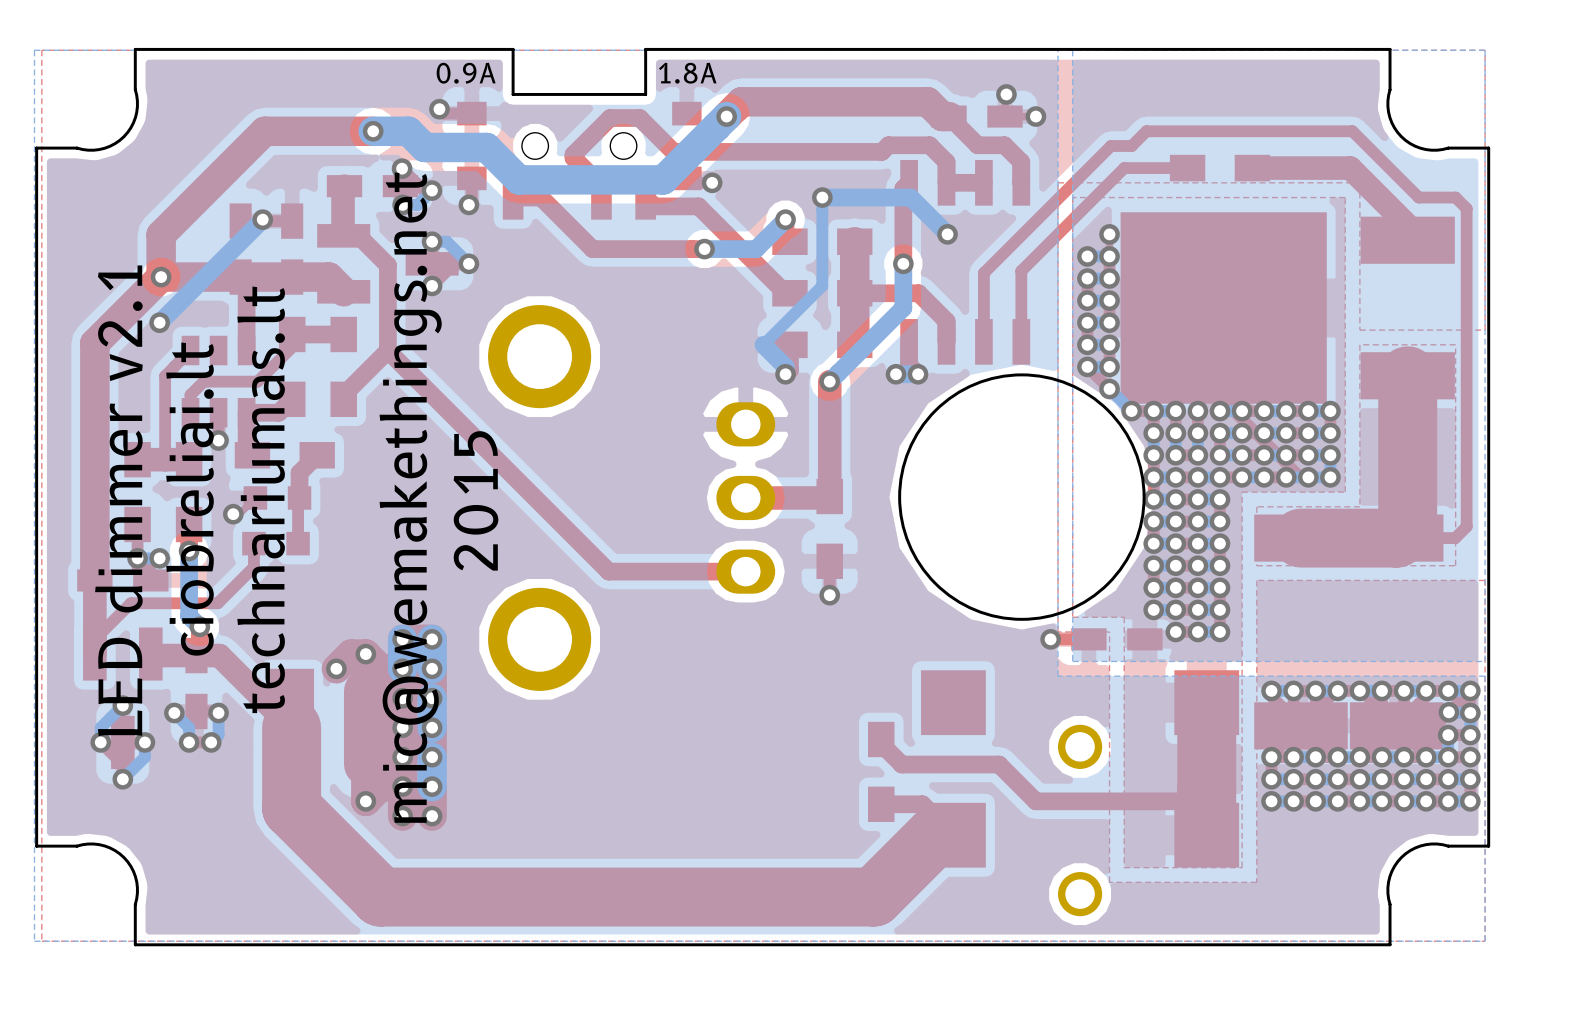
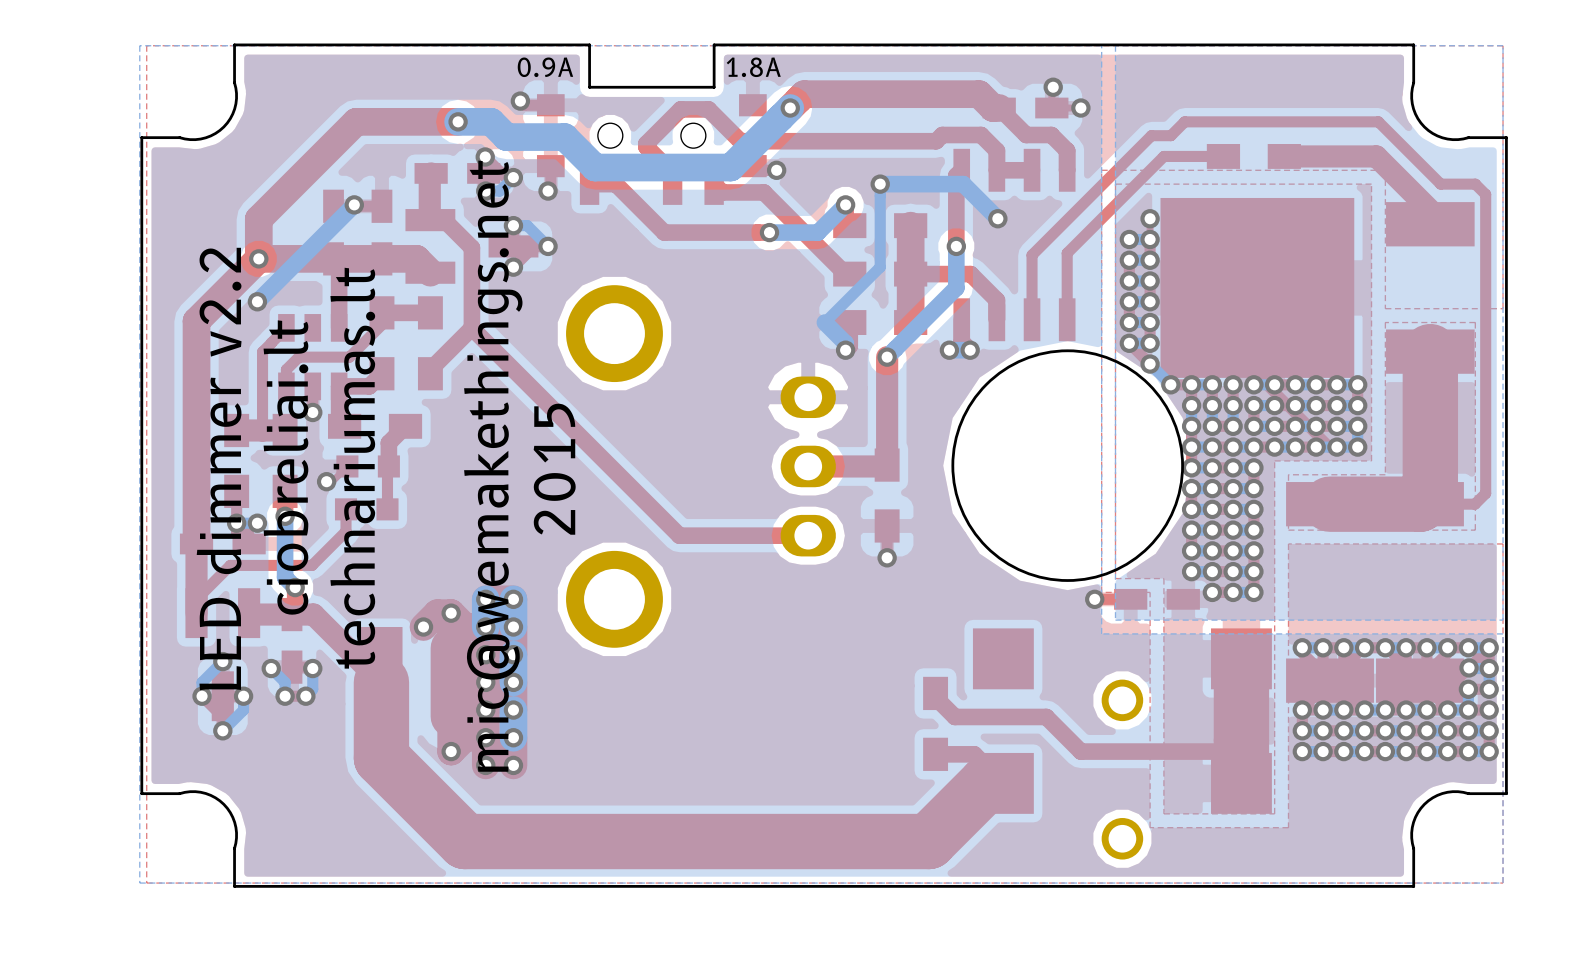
text: LED dimmer v2.1 (118, 500) -> LED dimmer v2.2 (219, 469)

